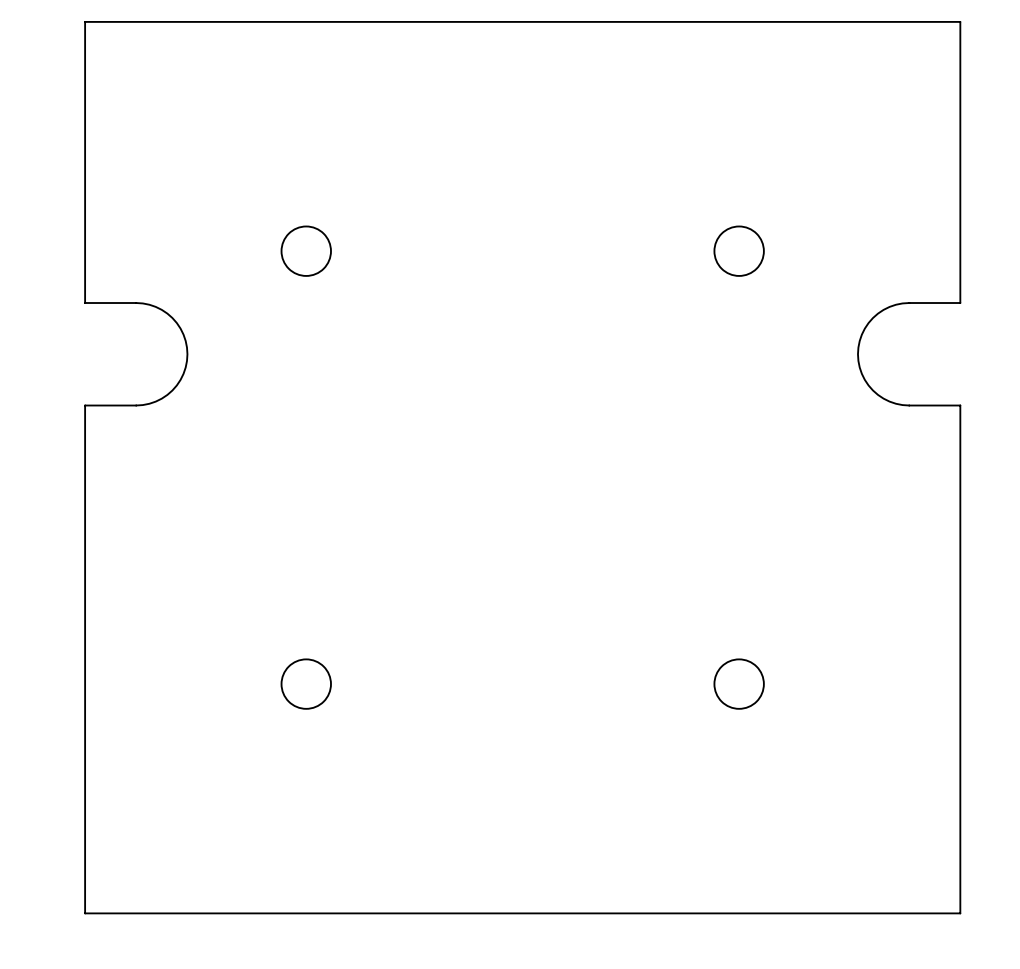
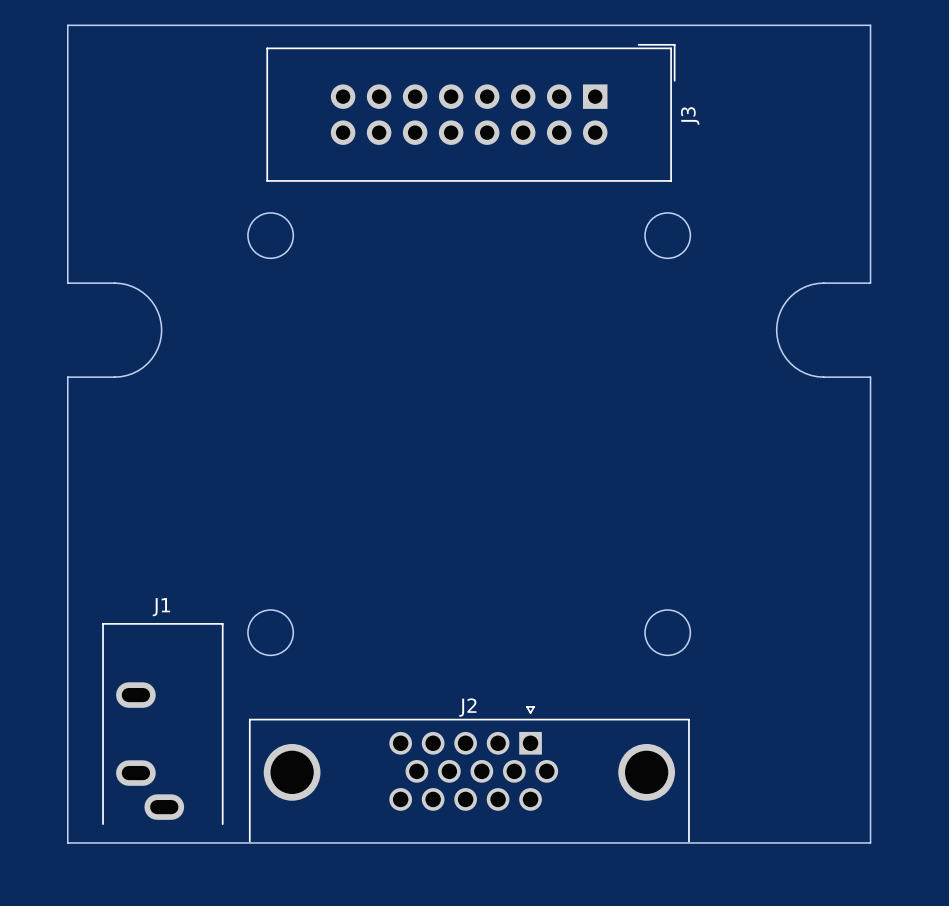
J3: none -> (470, 112)
J1: none -> (162, 723)
J2: none -> (469, 774)

